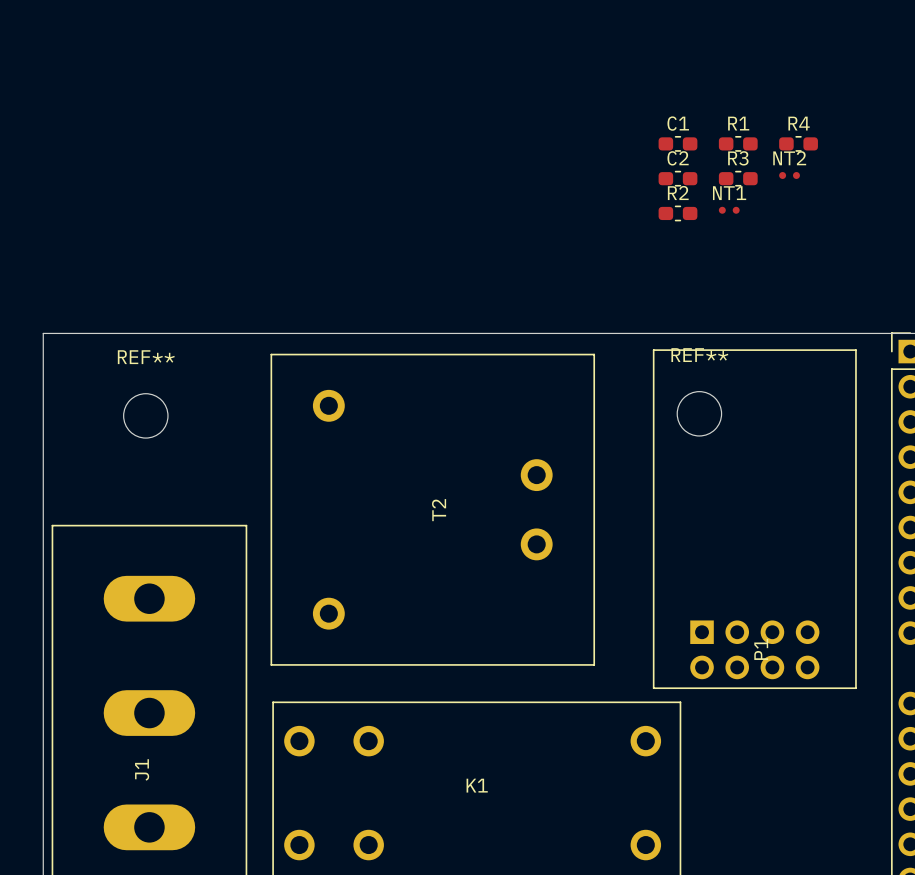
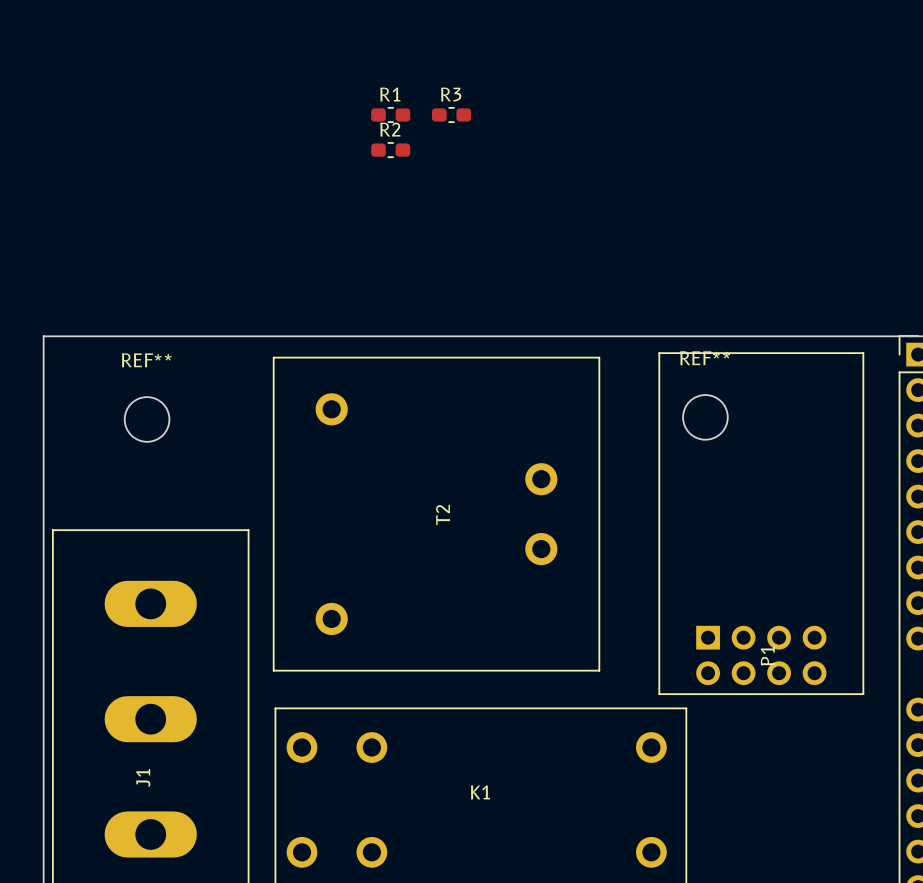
C1: (677, 143) -> none
R1 position: (738, 143) -> (390, 114)
R4: (798, 143) -> none
NT2: (789, 175) -> none
C2: (677, 178) -> none
R3 position: (738, 178) -> (451, 114)
NT1: (729, 210) -> none
R2 position: (677, 213) -> (390, 150)

